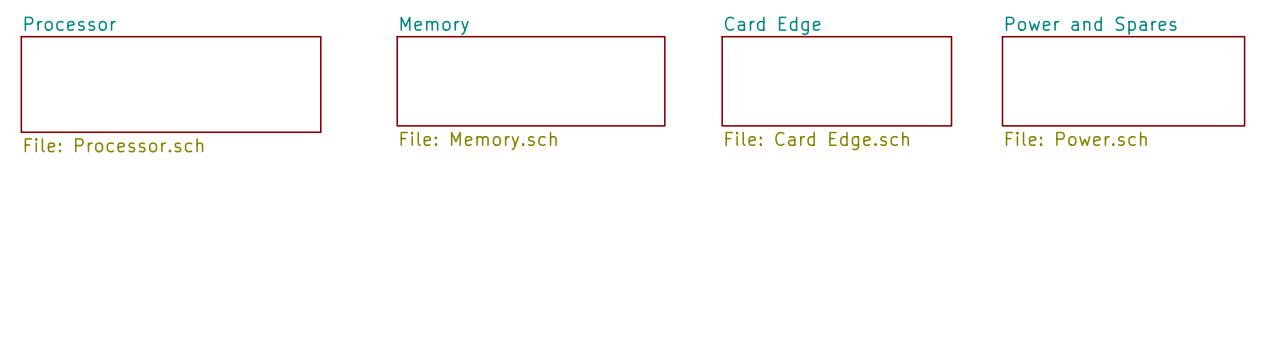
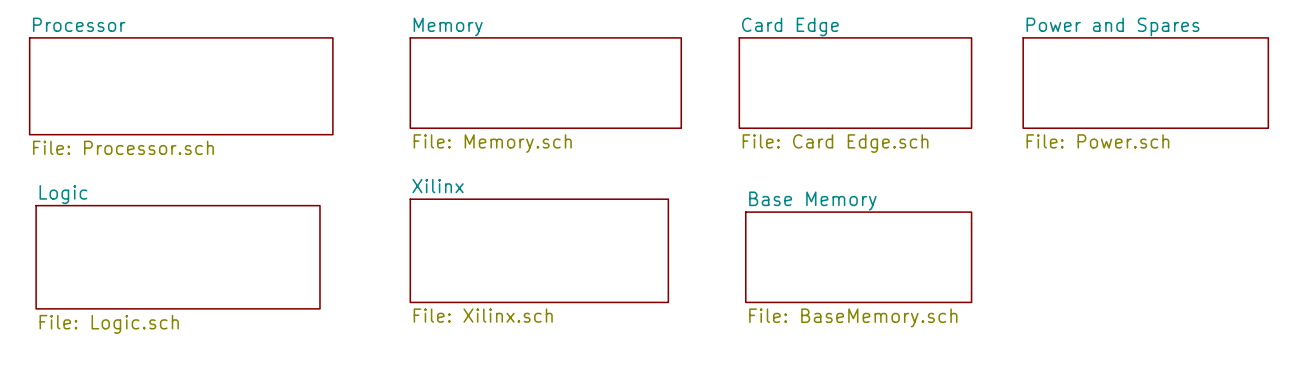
sheet Xilinx: none -> File: Xilinx.sch (539, 250)
sheet Logic: none -> File: Logic.sch (178, 257)
sheet Base Memory: none -> File: BaseMemory.sch (858, 257)

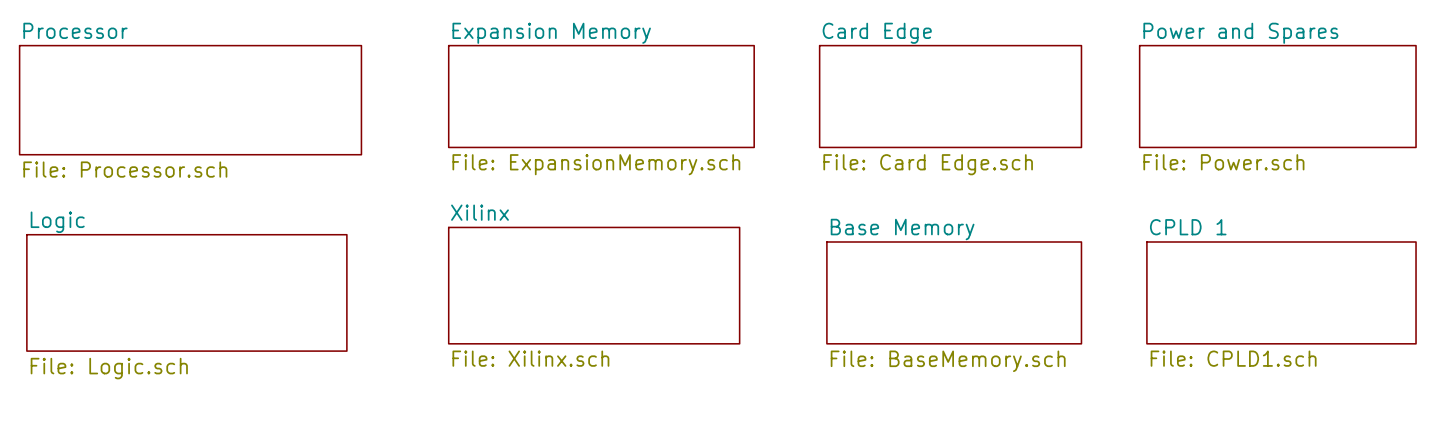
sheet Memory name: Memory (448, 26) -> Expansion Memory (551, 33)
sheet Memory value: File: Memory.sch (492, 143) -> File: ExpansionMemory.sch (596, 164)
sheet CPLD 1: none -> File: CPLD1.sch (1281, 292)

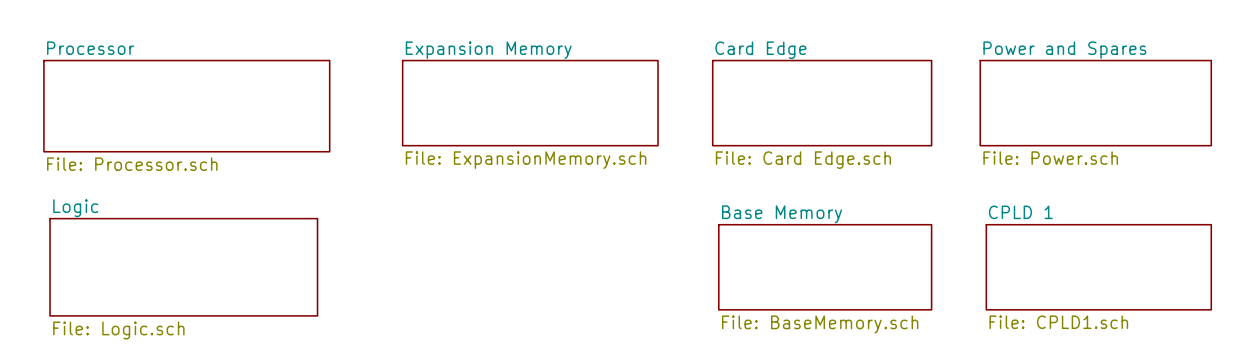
sheet Xilinx: File: Xilinx.sch (594, 285) -> none

